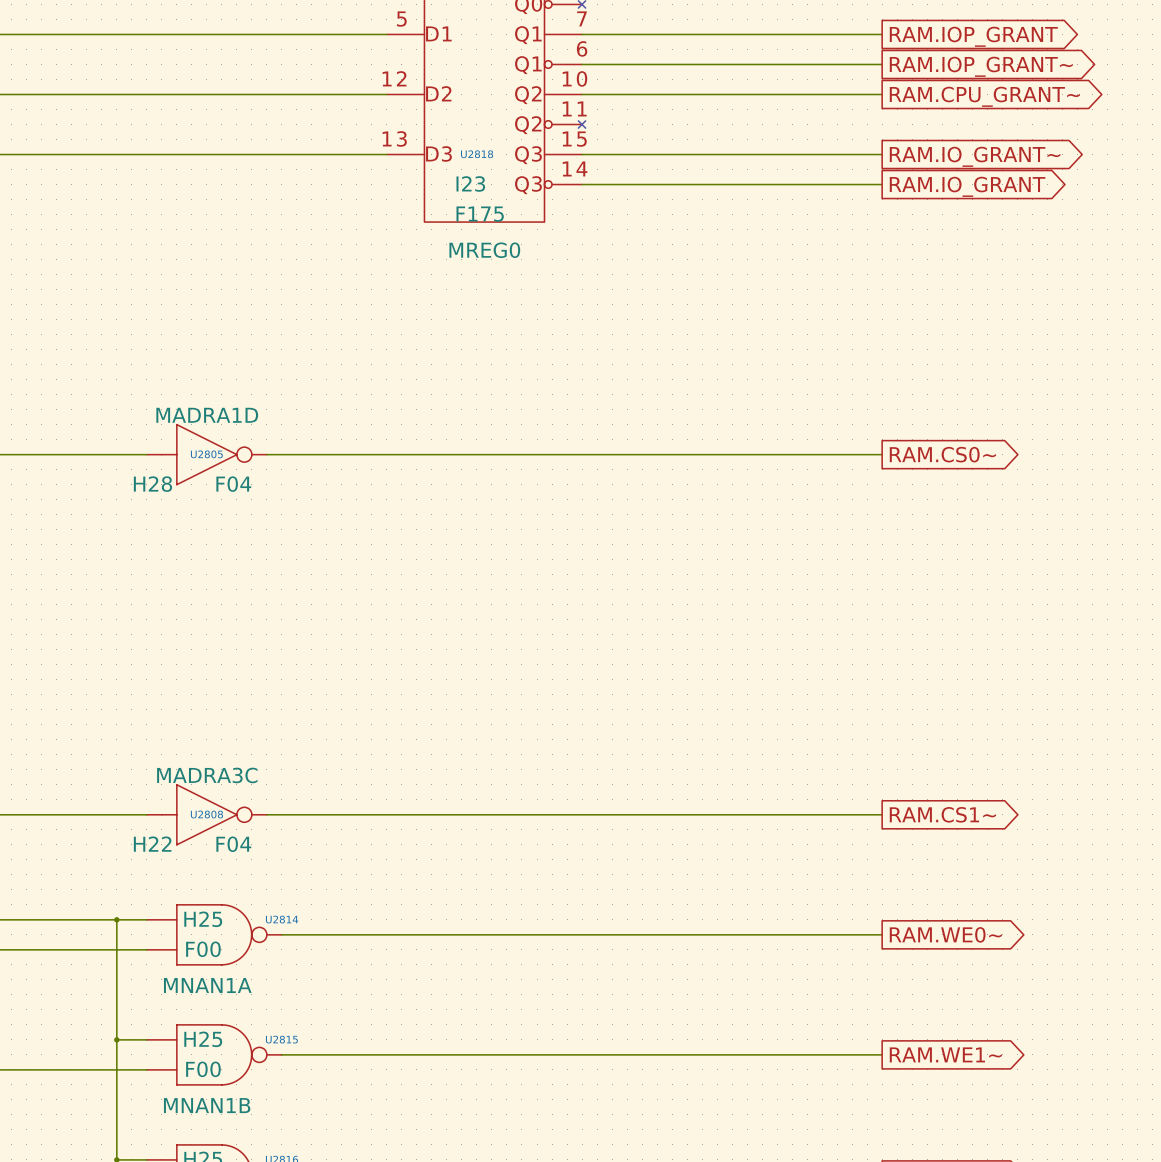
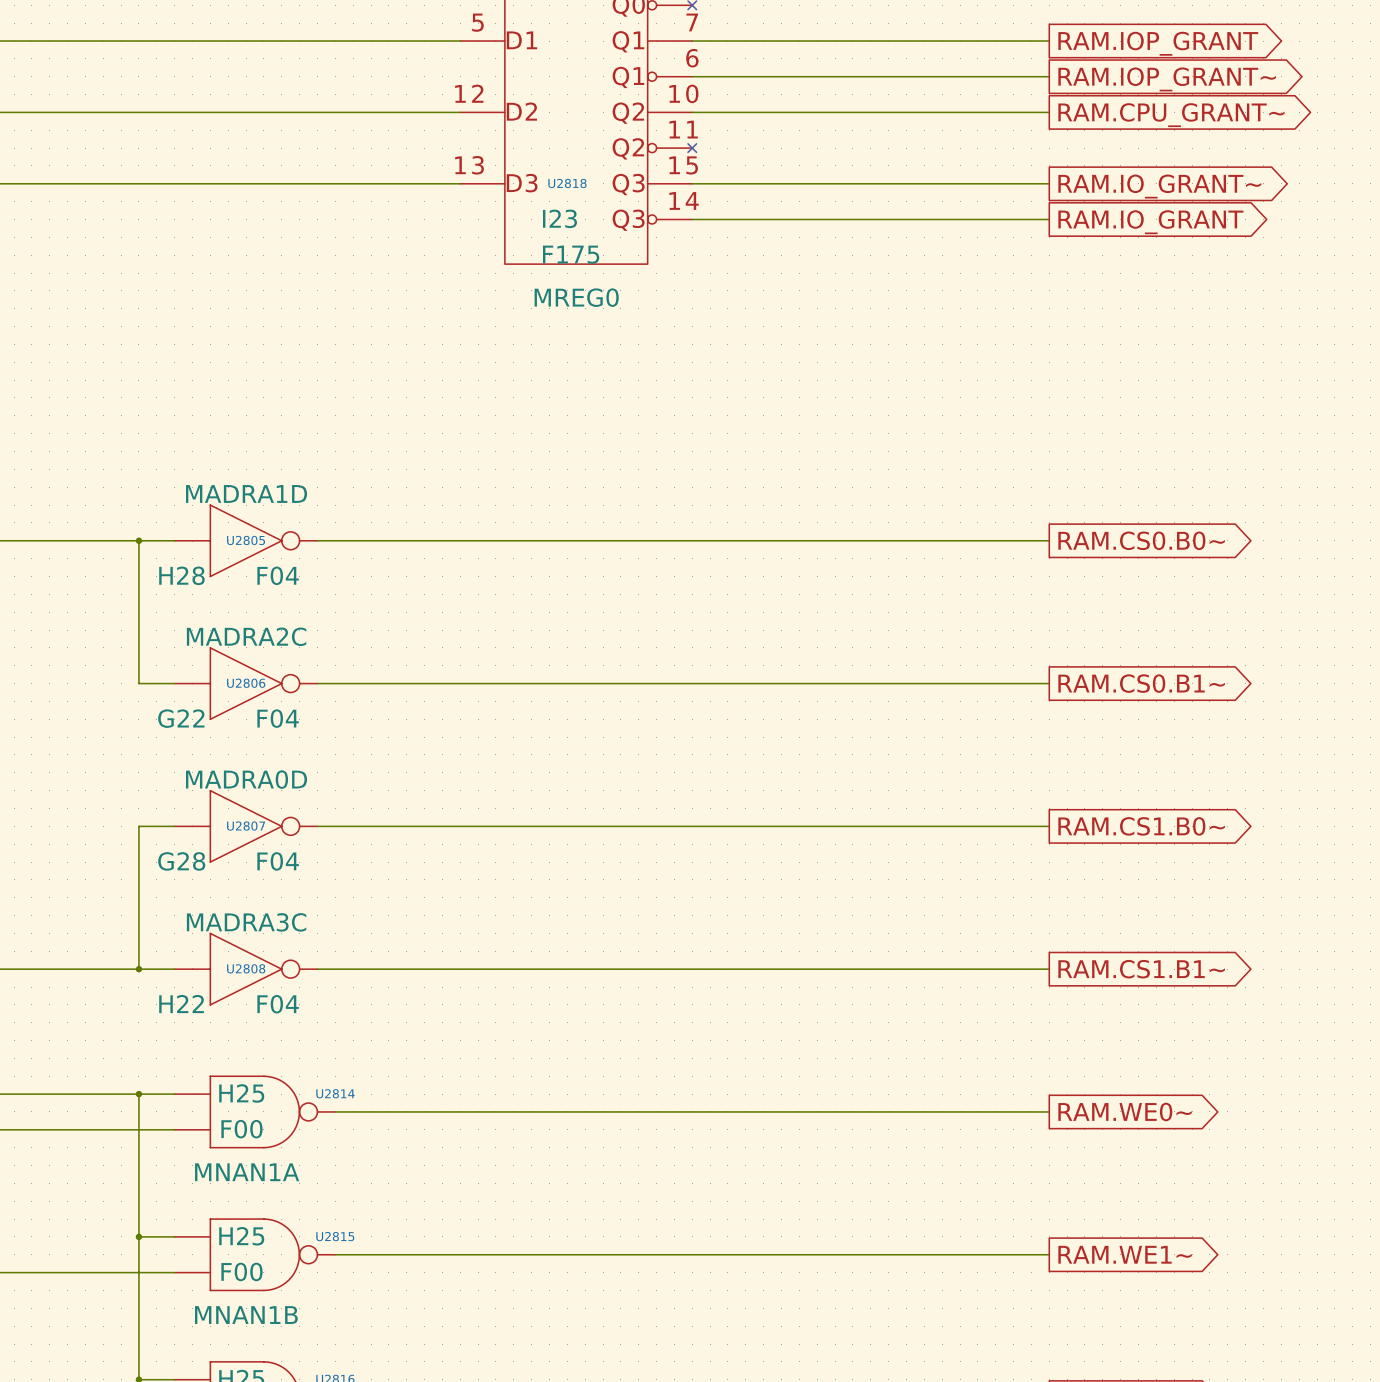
wire: none -> (138, 540) (138, 683) (174, 683)
junction: none -> (138, 540)
global label: RAM.CS0~ (942, 454) -> RAM.CS0.B0~ (1141, 540)
U2806: none -> F04 (246, 683)
wire: none -> (317, 683) (1049, 683)
global label: none -> RAM.CS0.B1~ (1141, 683)
wire: none -> (174, 826) (138, 826) (138, 969)
U2807: none -> F04 (246, 826)
wire: none -> (317, 826) (1049, 826)
global label: none -> RAM.CS1.B0~ (1141, 826)
junction: none -> (138, 969)
global label: RAM.CS1~ (942, 814) -> RAM.CS1.B1~ (1141, 969)

